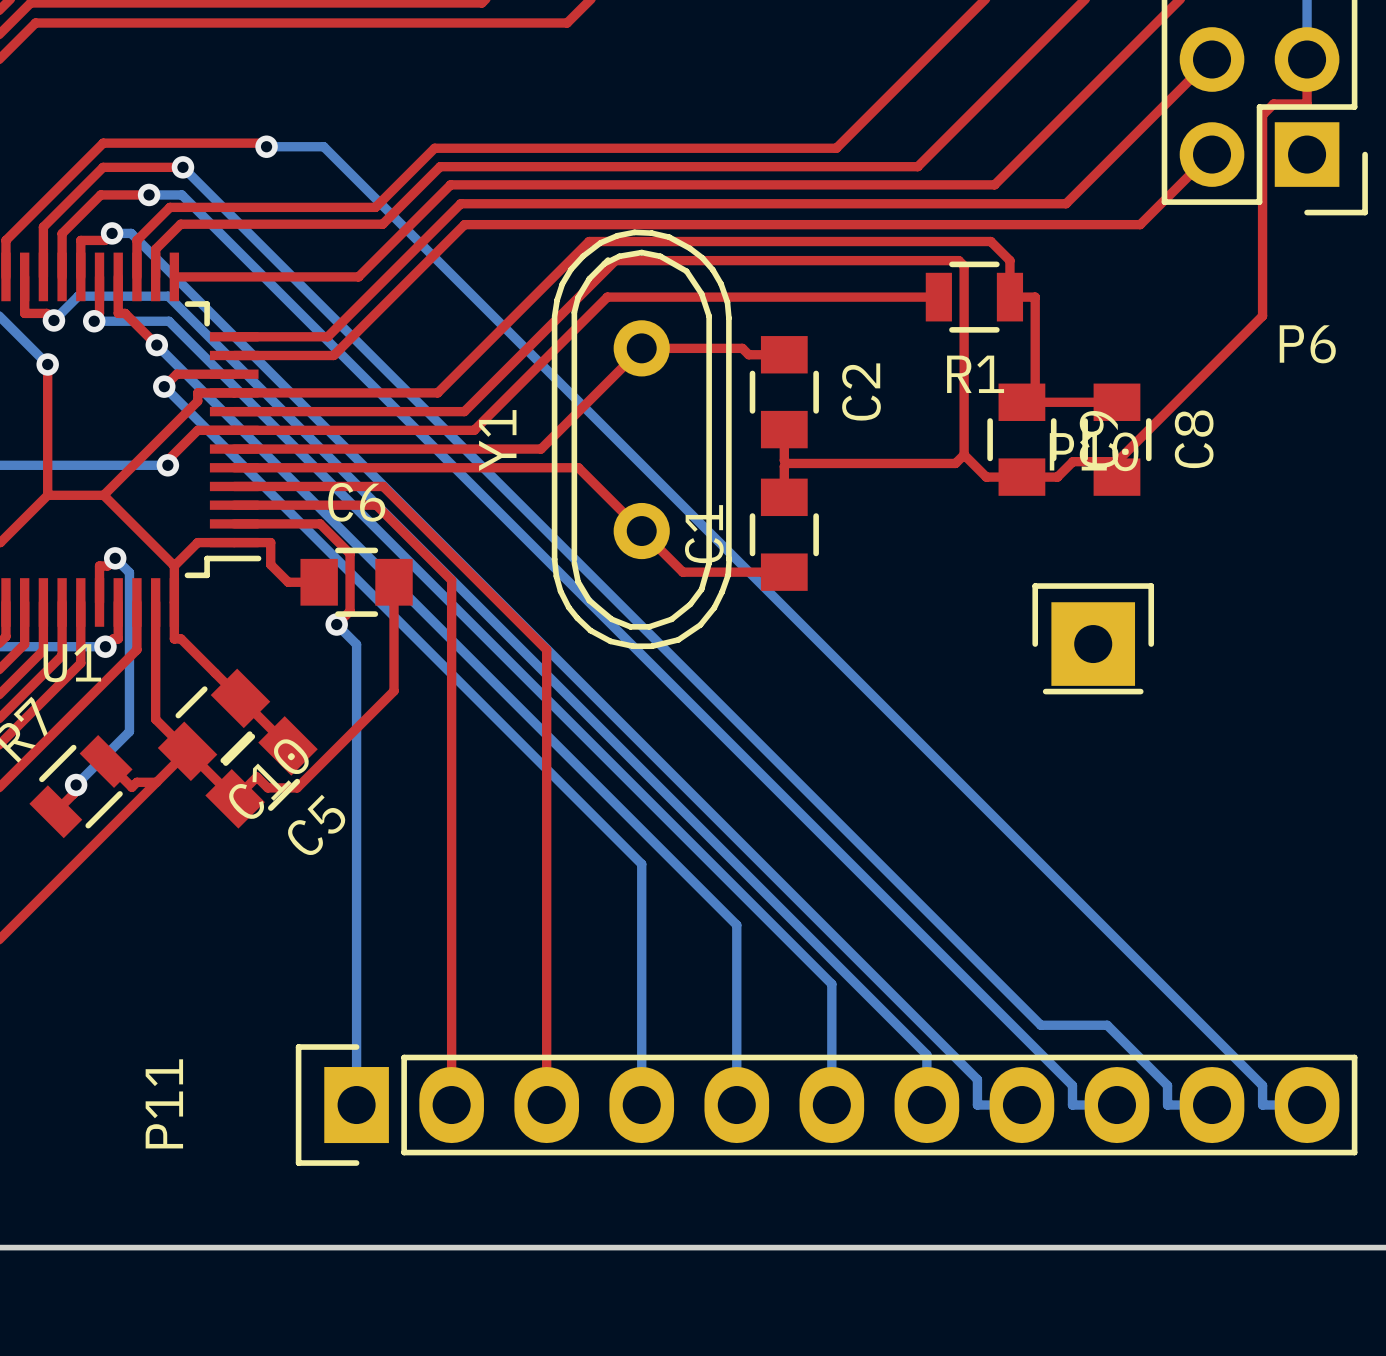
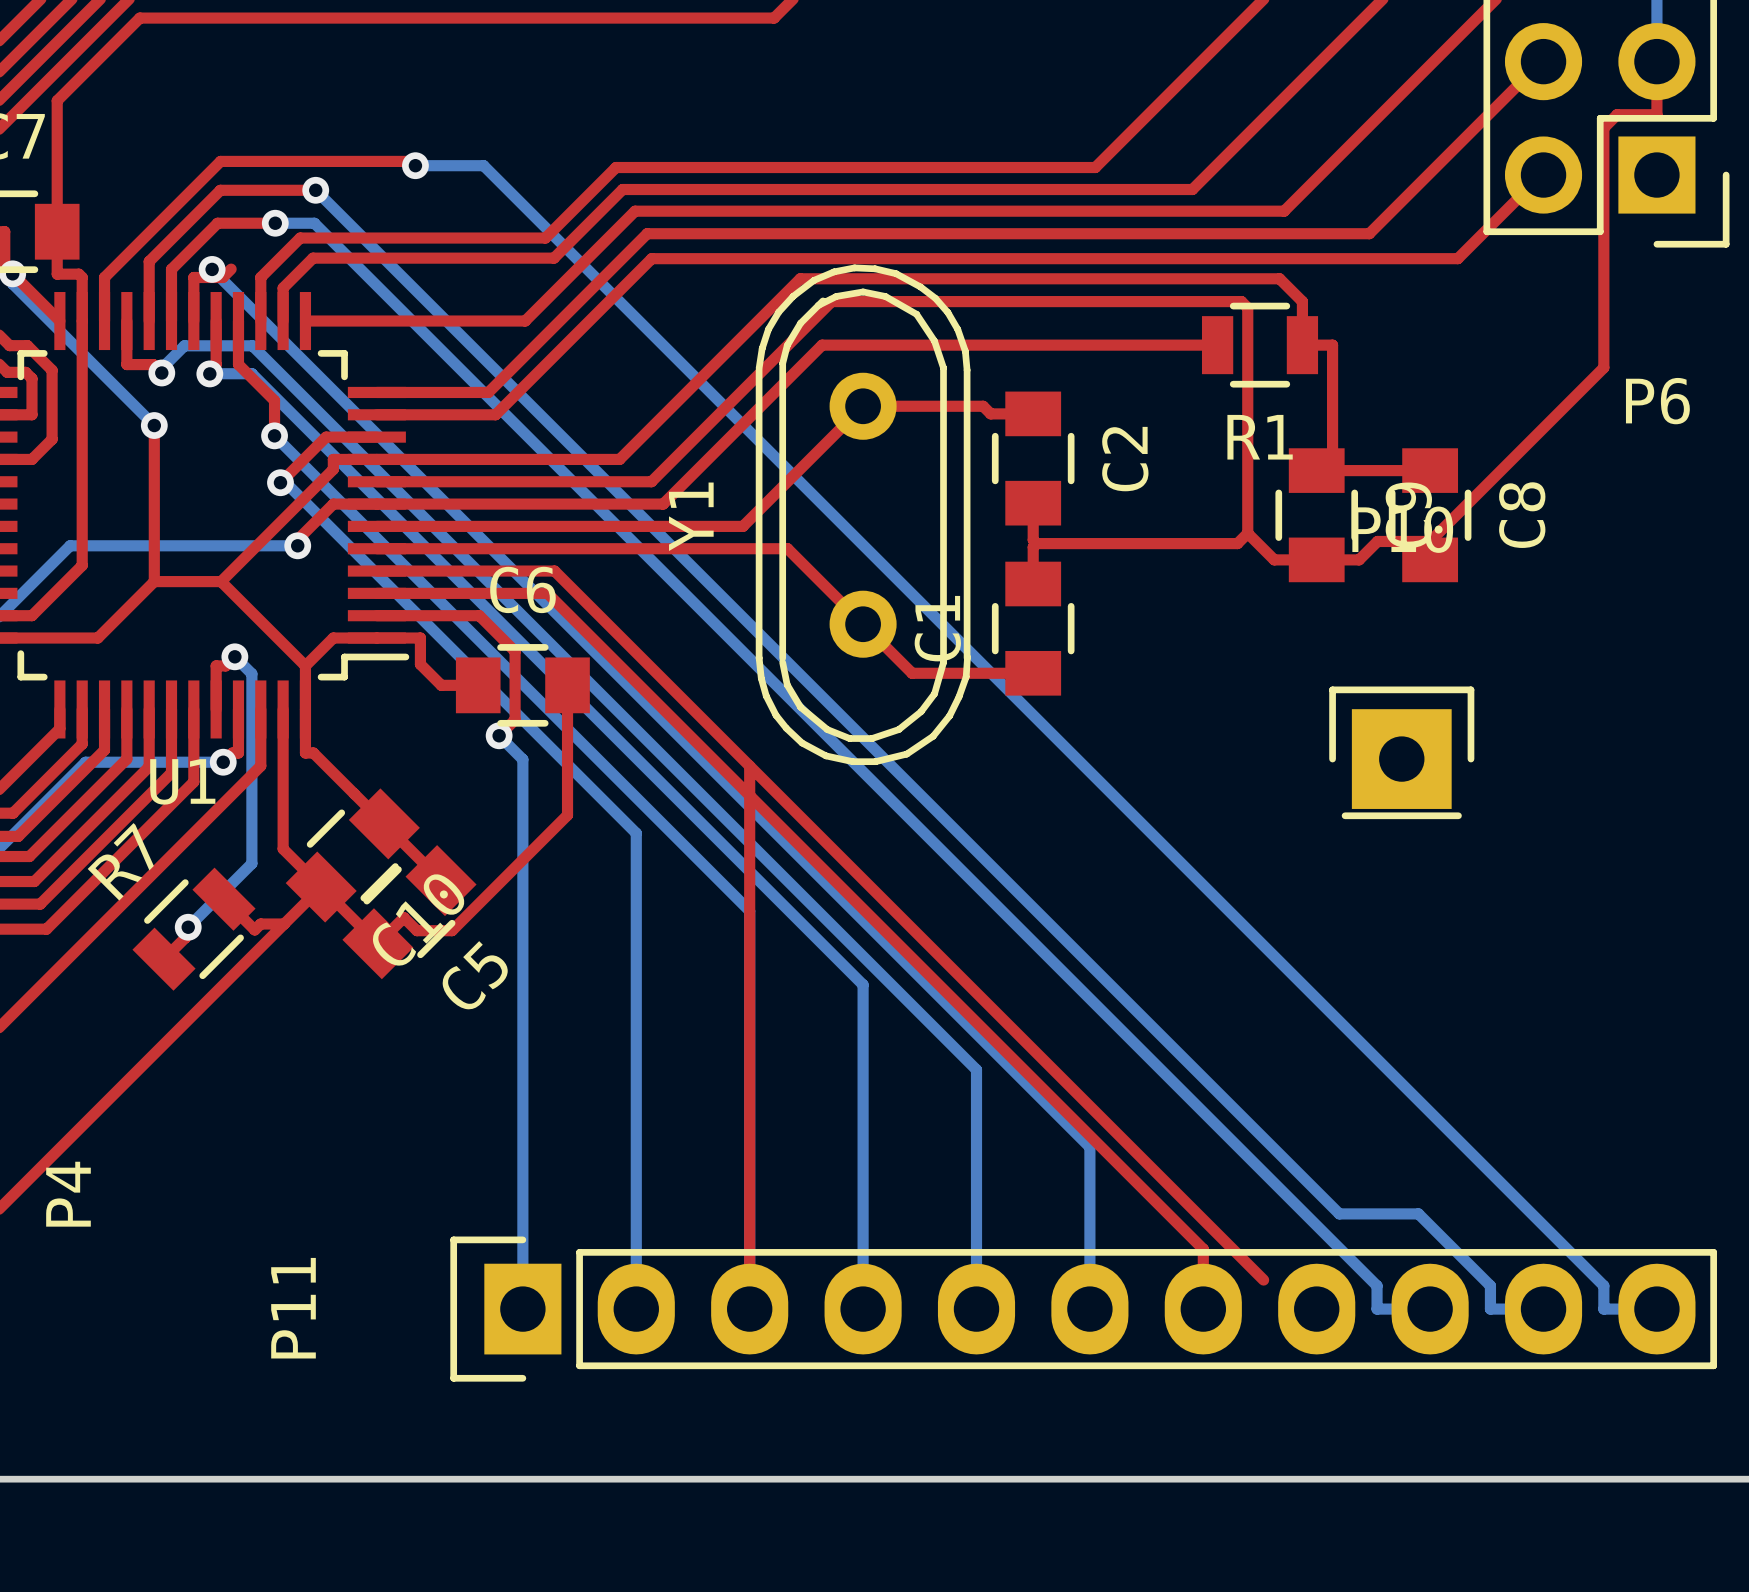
bottom track: (112, 233) (131, 233) (977, 1079) (977, 1105) (1021, 1105) -> none
via position: (112, 233) -> (212, 269)
top track: (118, 313) (125, 313) (156, 345) -> (238, 364) (274, 400) (274, 435)
bottom track: (53, 320) (78, 296) (168, 296) (926, 1054) (926, 1105) -> none
bottom track: (129, 321) (168, 321) (831, 984) -> (212, 269) (1089, 1147) (1089, 1164)
bottom track: (156, 345) (736, 925) -> (157, 372) (184, 345) (252, 345) (976, 1069) (976, 1094)
via: (156, 345) -> none
bottom track: none -> (274, 435) (749, 910) (749, 1309)
top track: (191, 374) (176, 374) (164, 386) -> (326, 437) (280, 482)
bottom track: (164, 386) (641, 864) -> (251, 373) (863, 984) (863, 1021)
via position: (164, 386) -> (274, 435)
bottom track: none -> (280, 482) (285, 482) (636, 833) (636, 1309)
via: none -> (280, 482)
top track: (376, 505) (451, 580) (451, 1105) -> (546, 593) (1203, 1249) (1203, 1309)

